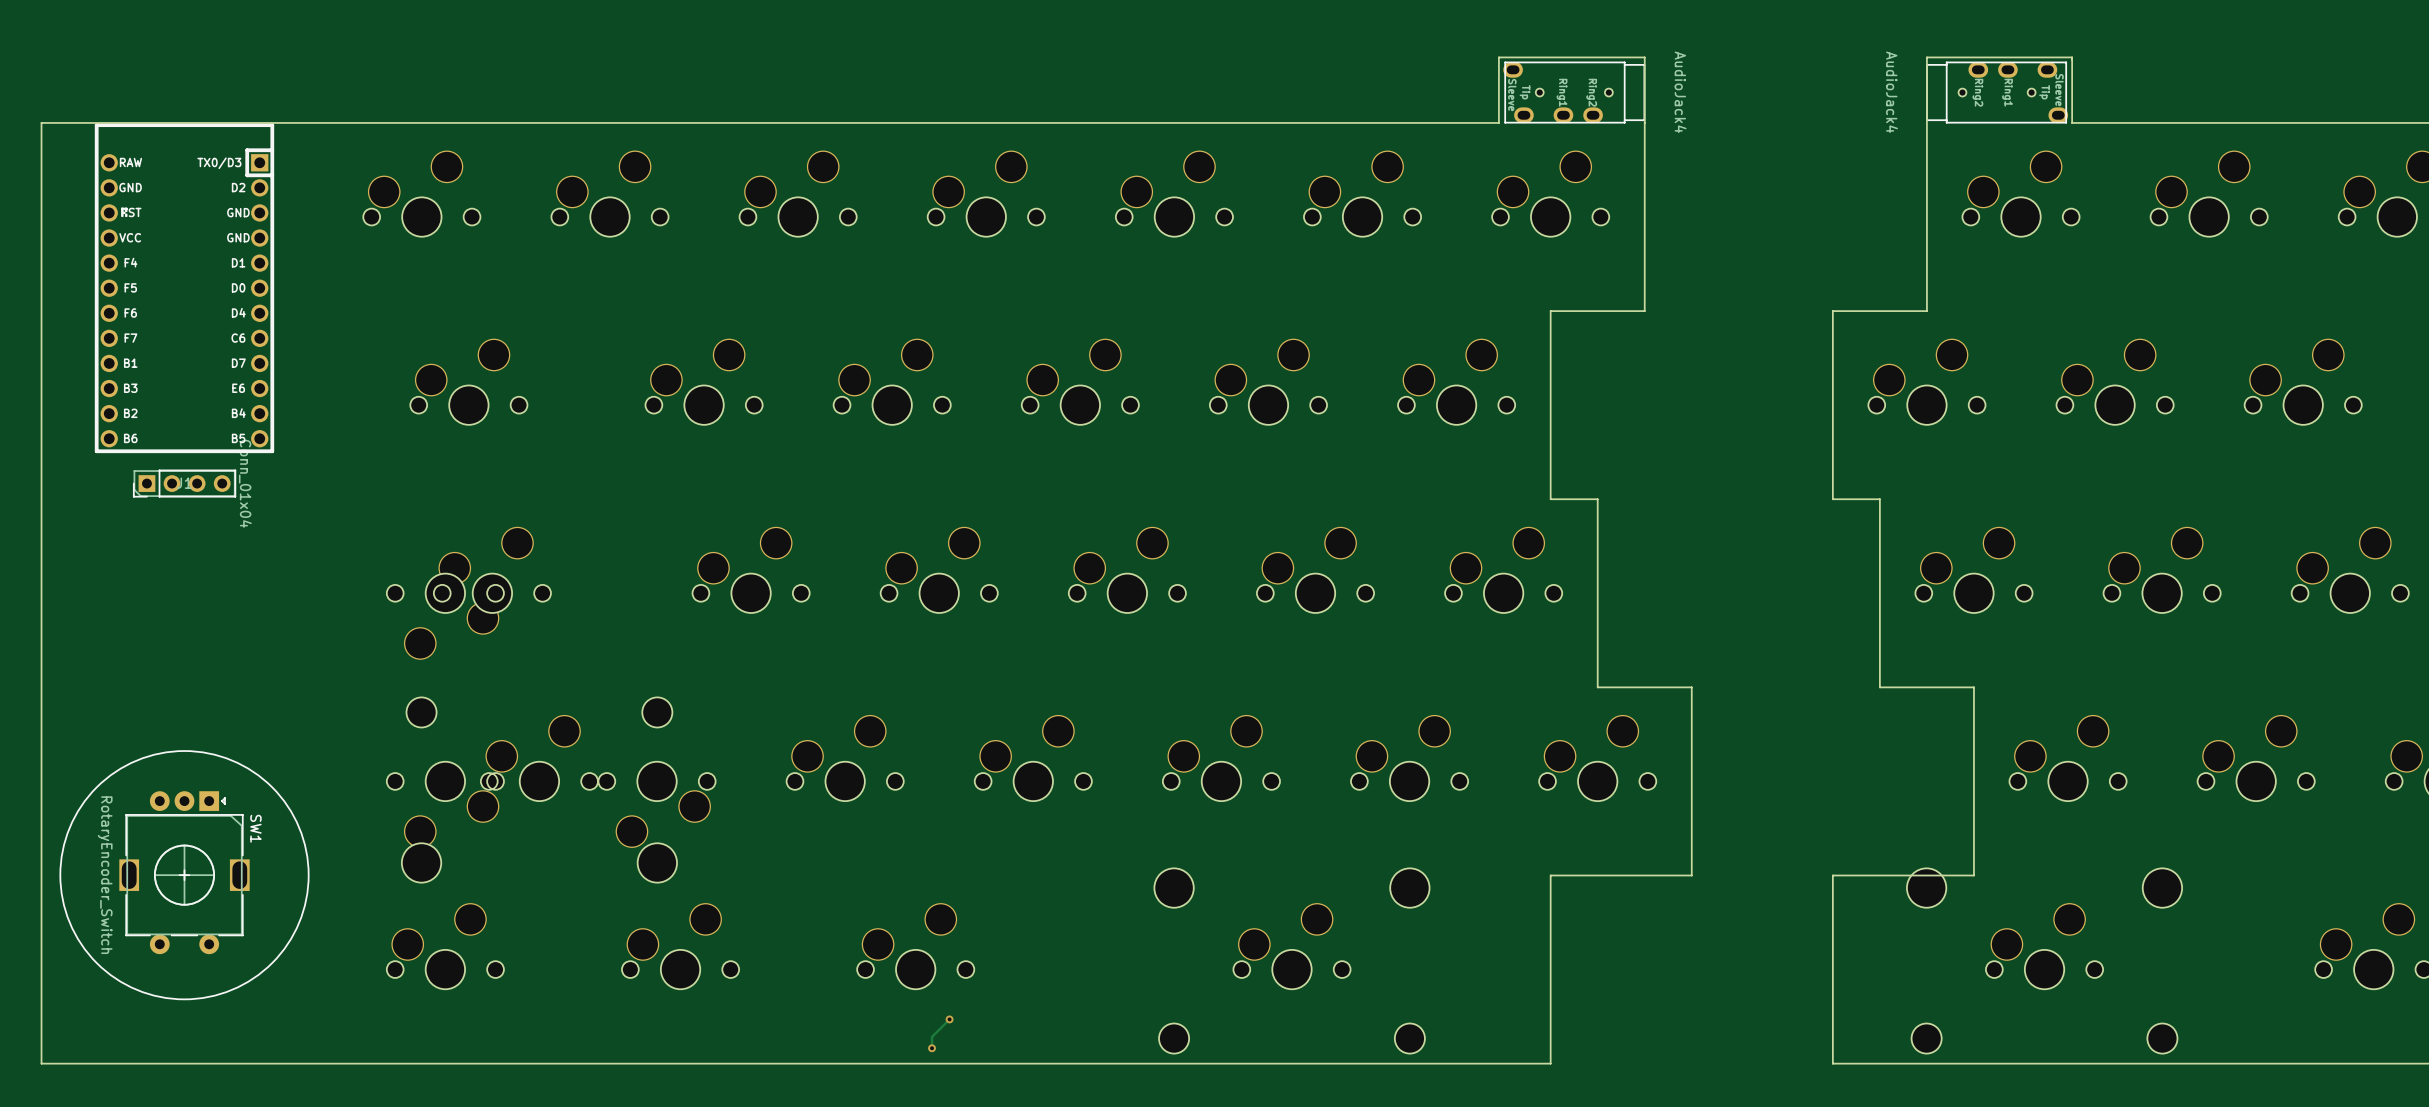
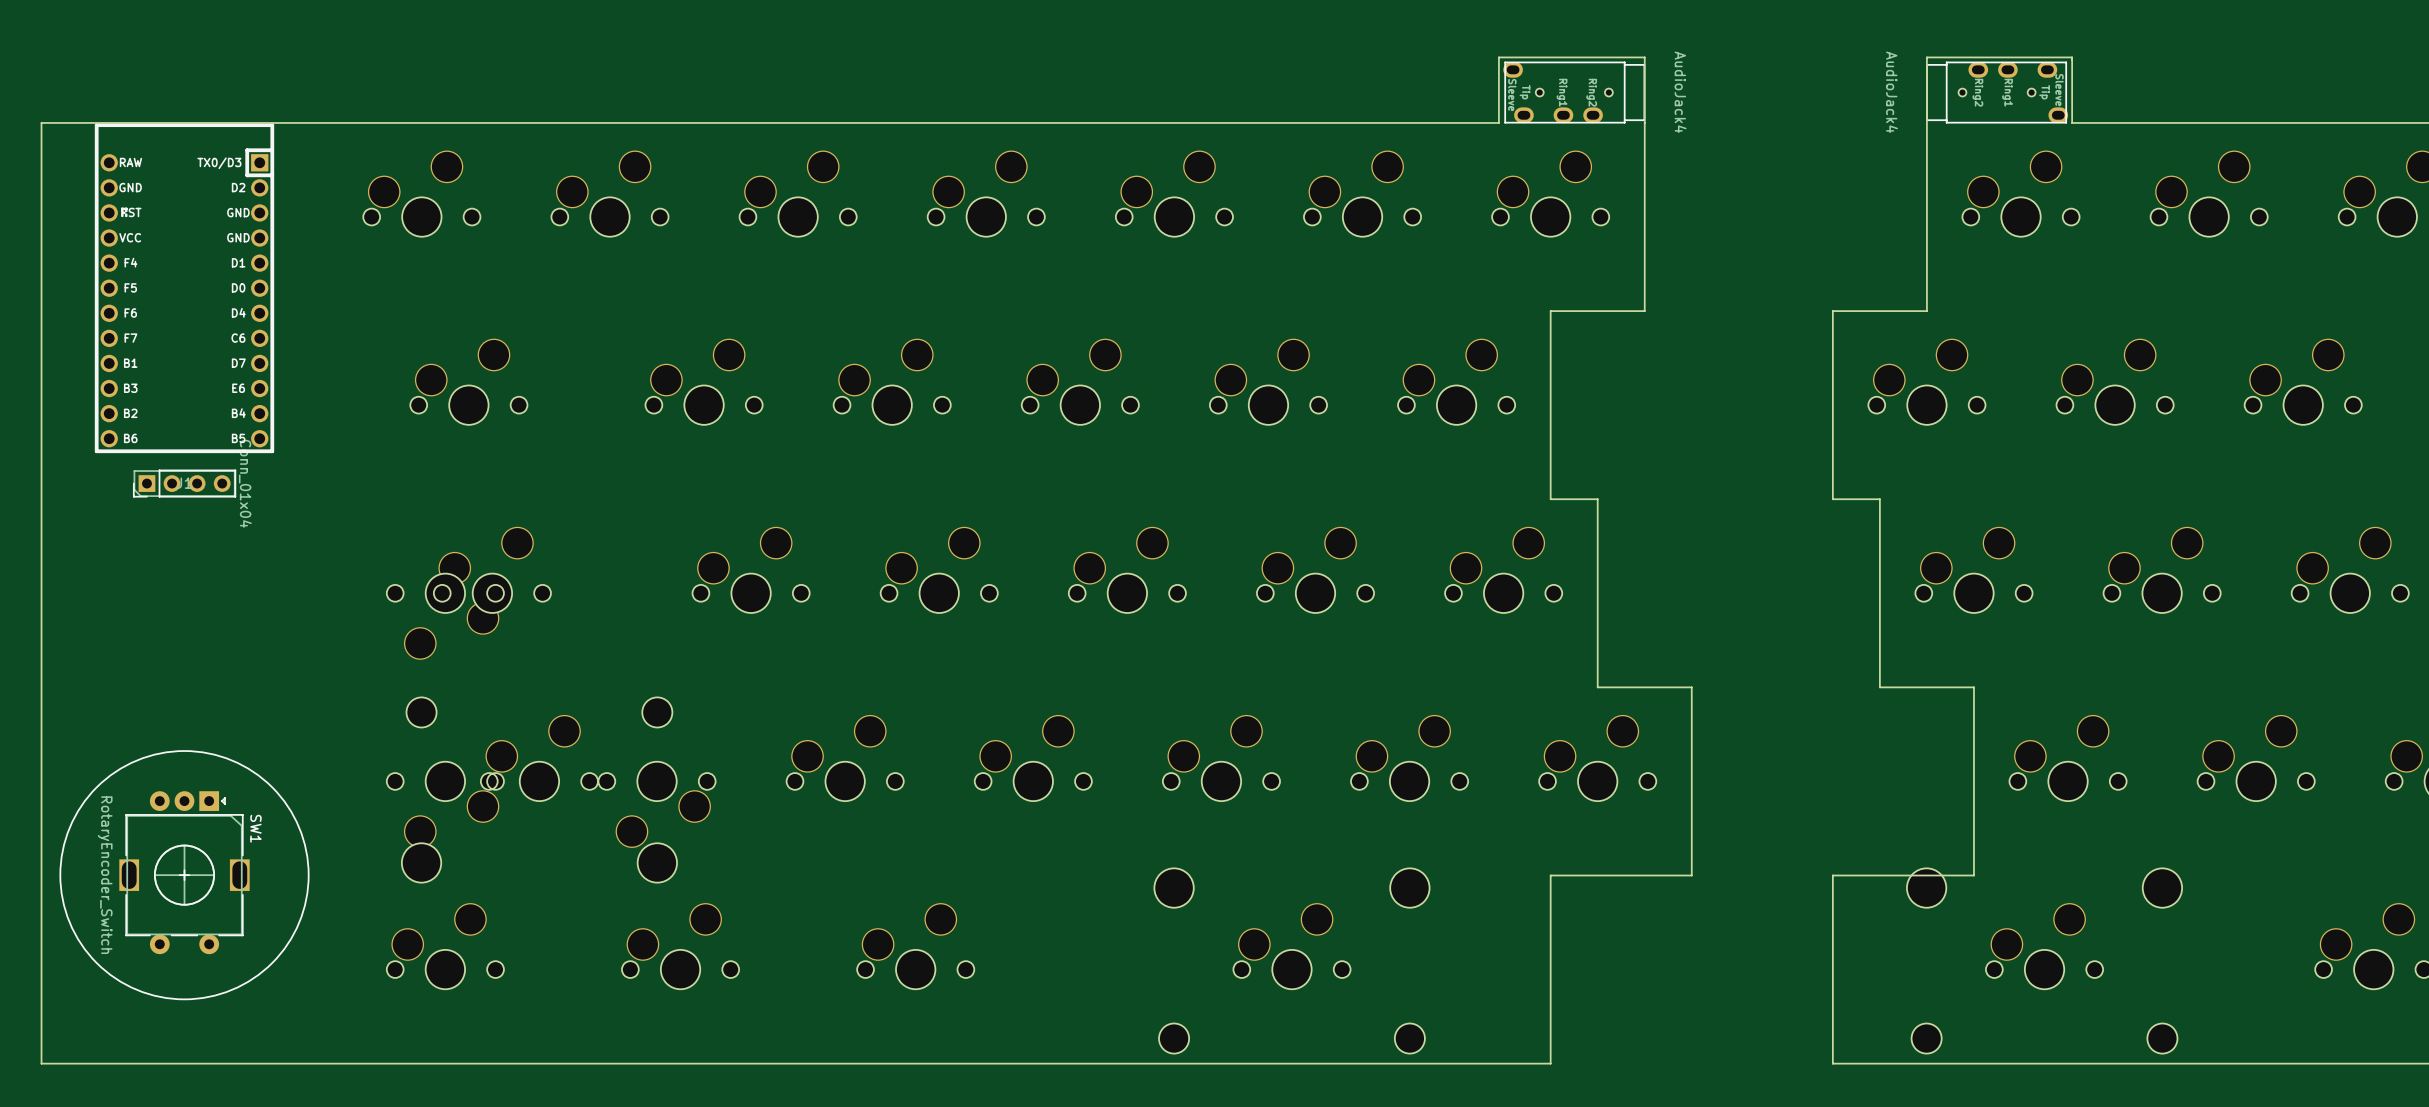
track: (949, 1019) (932, 1036) (932, 1048) -> none
via: (949, 1019) -> none
via: (932, 1048) -> none

